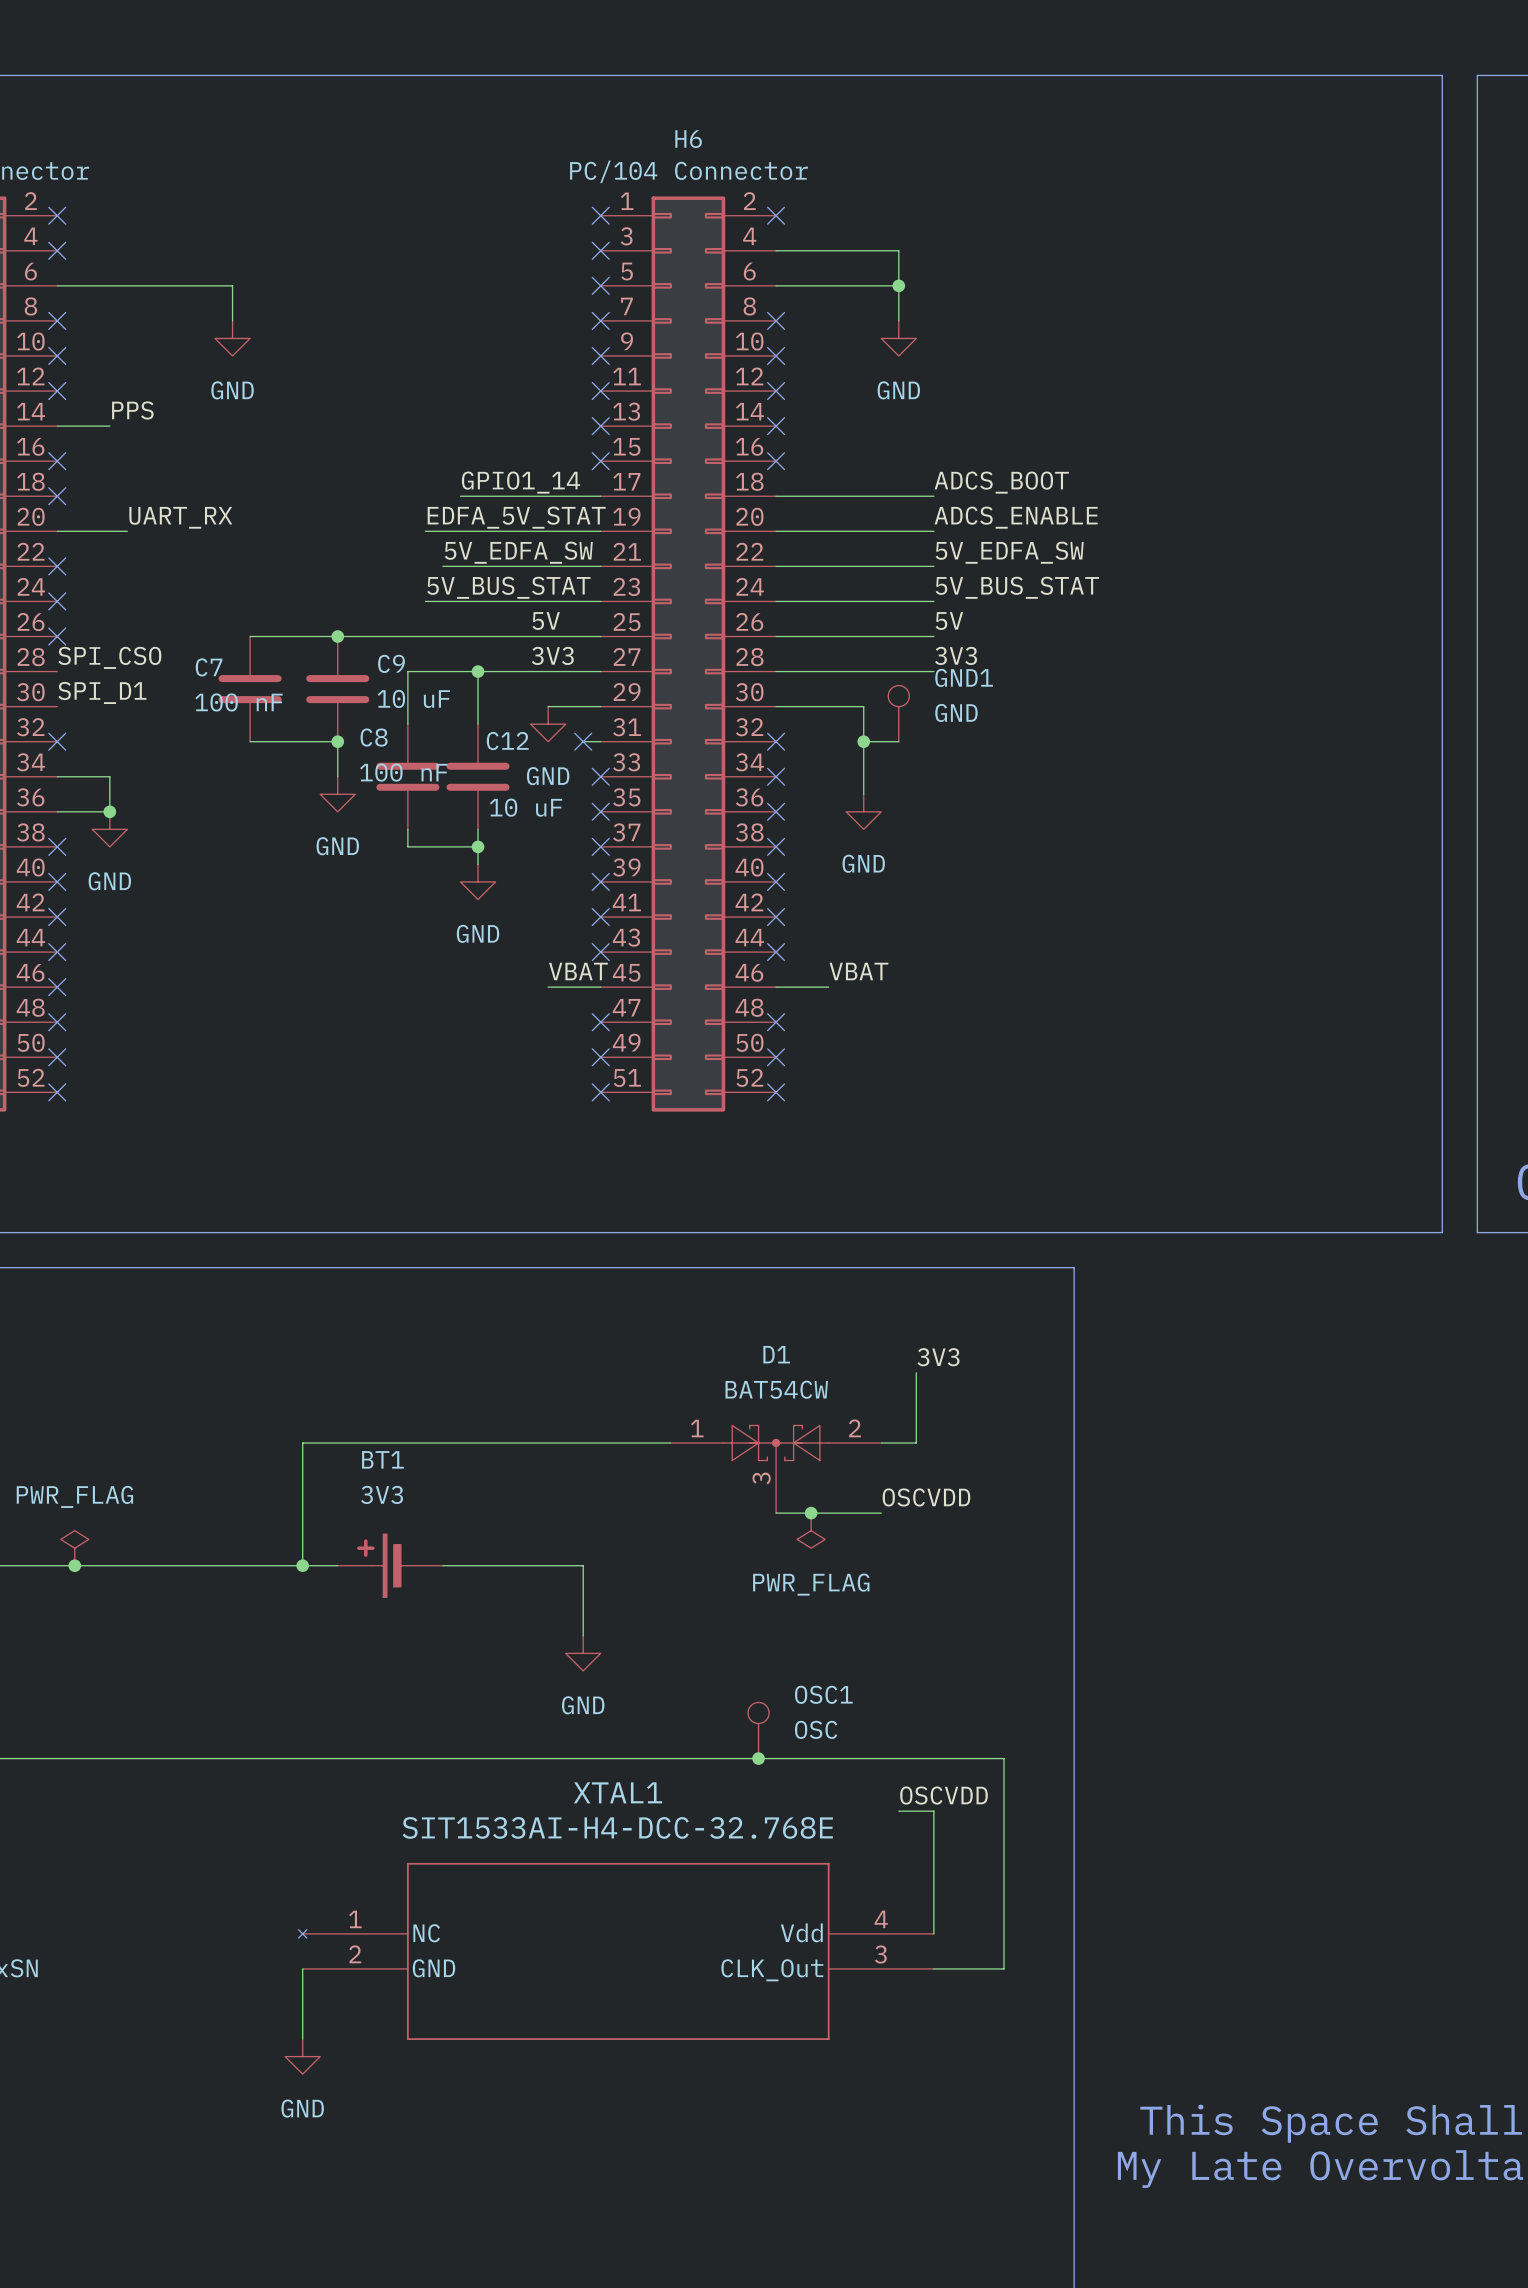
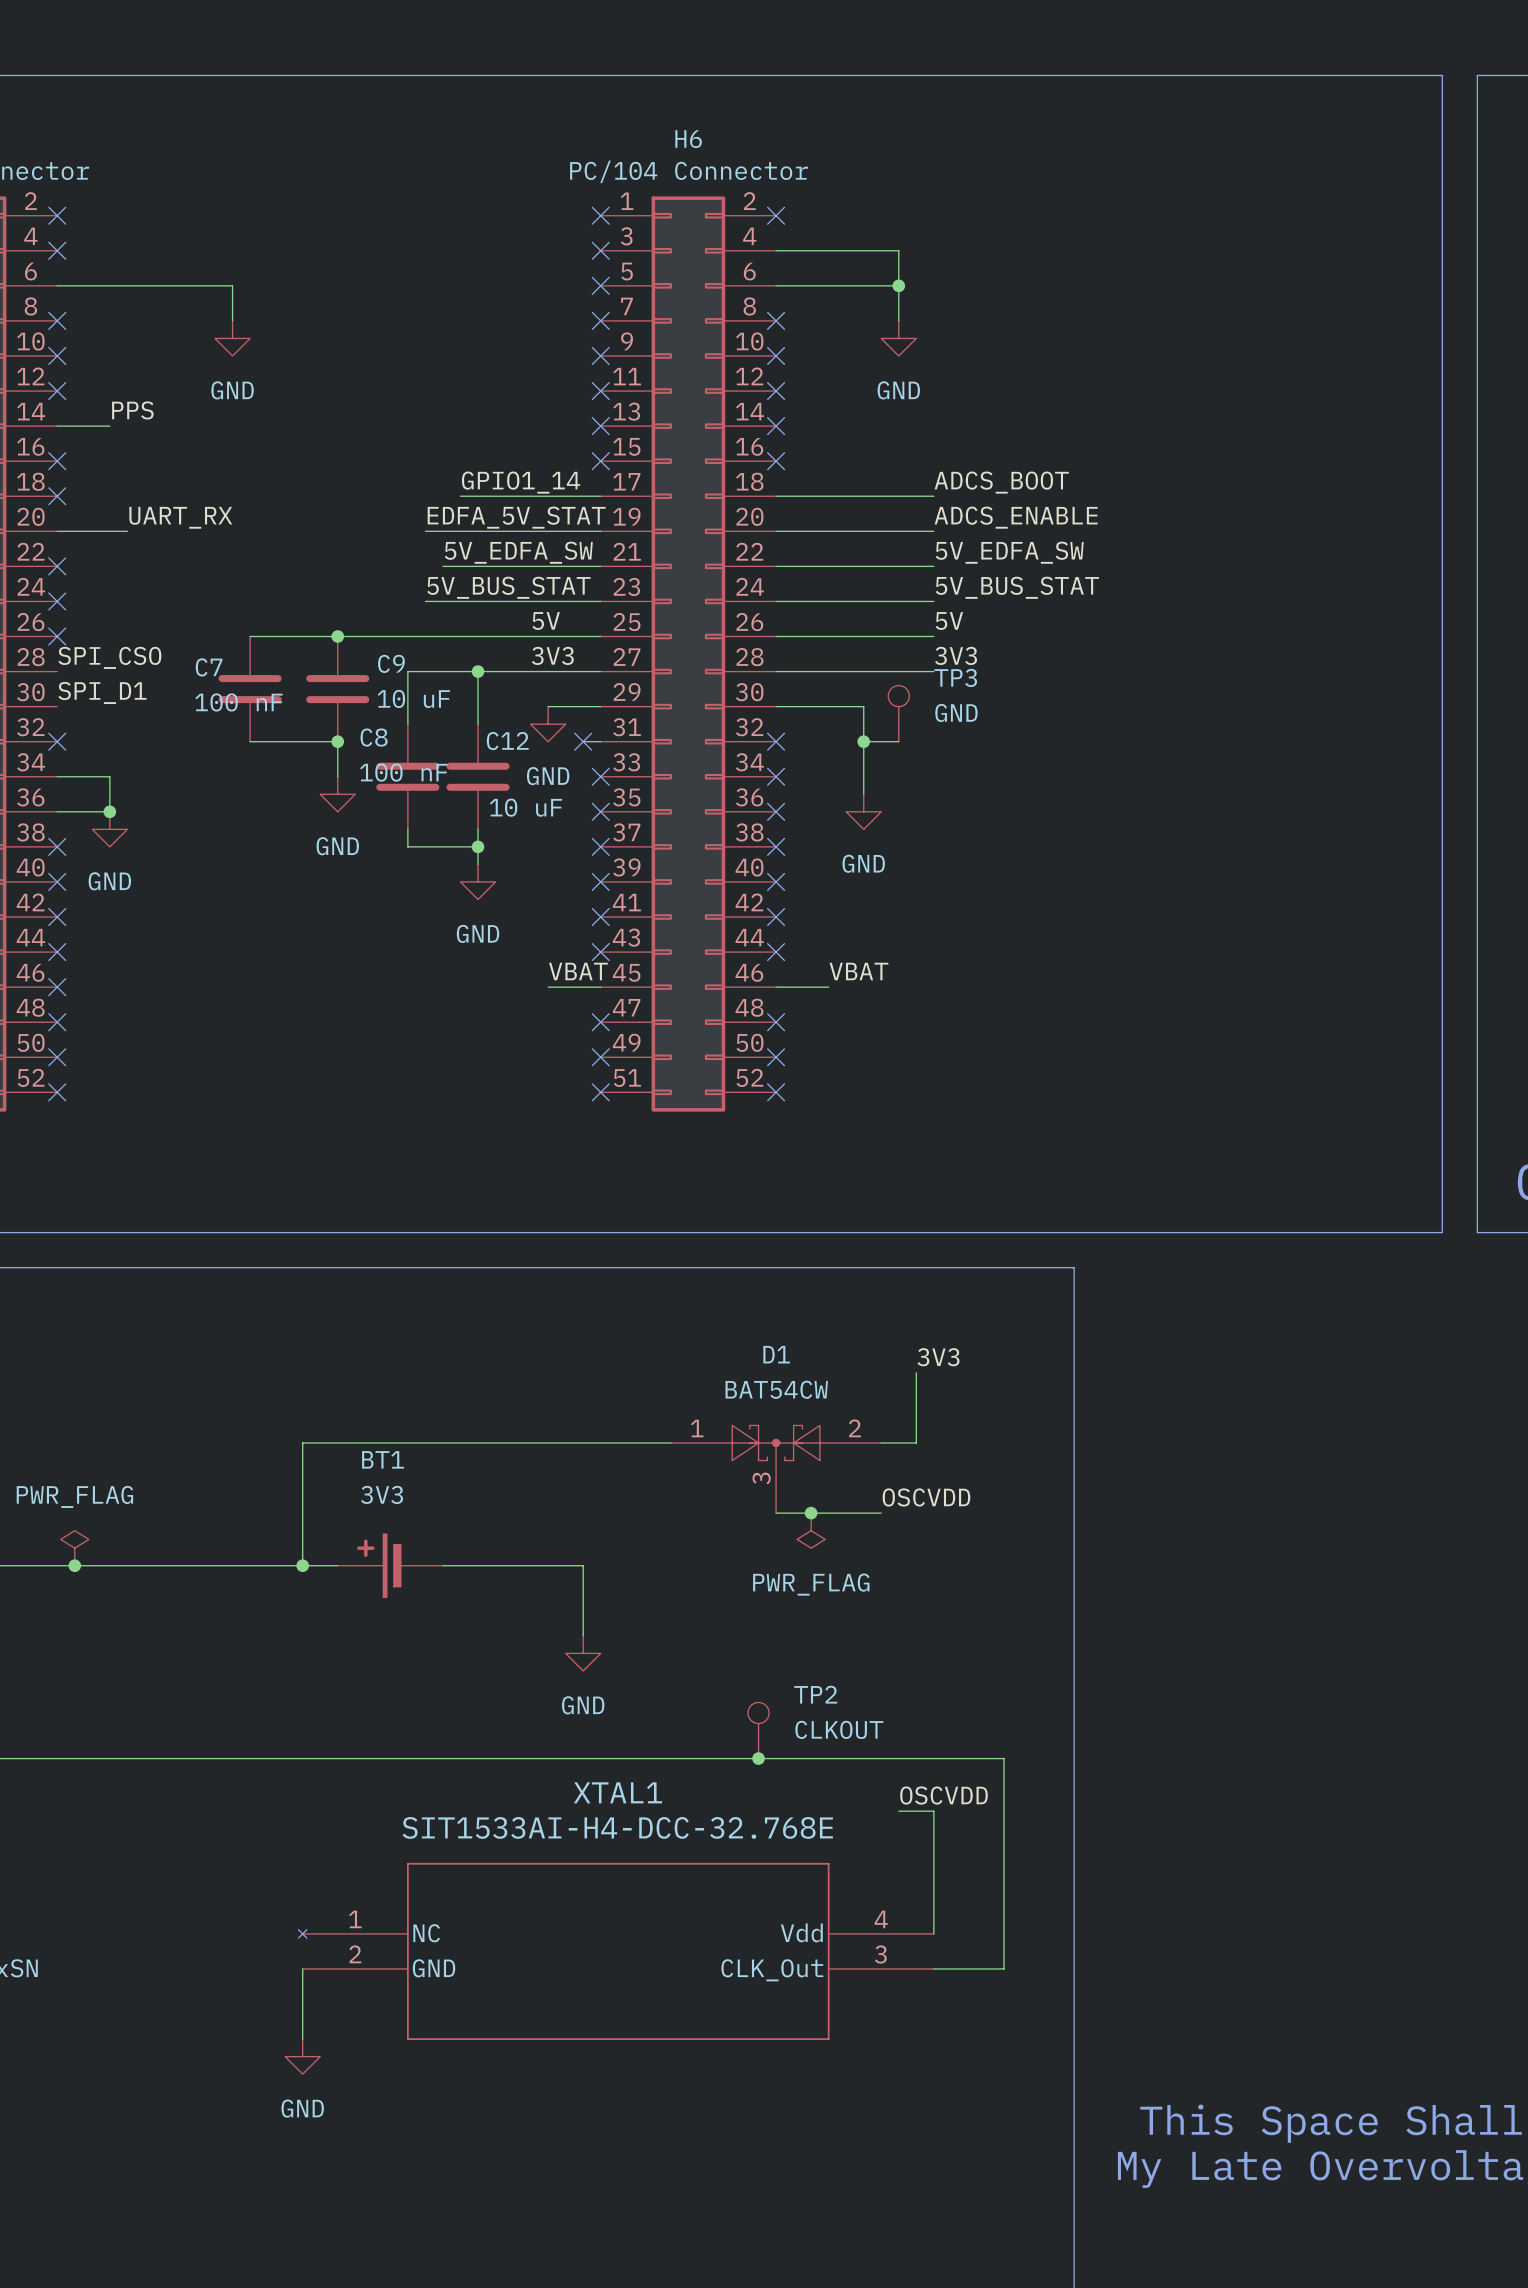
GND1 name: GND1 (964, 677) -> TP3 (955, 677)
OSC1 name: OSC1 (823, 1694) -> TP2 (815, 1694)
OSC1 value: OSC (816, 1729) -> CLKOUT (839, 1729)

